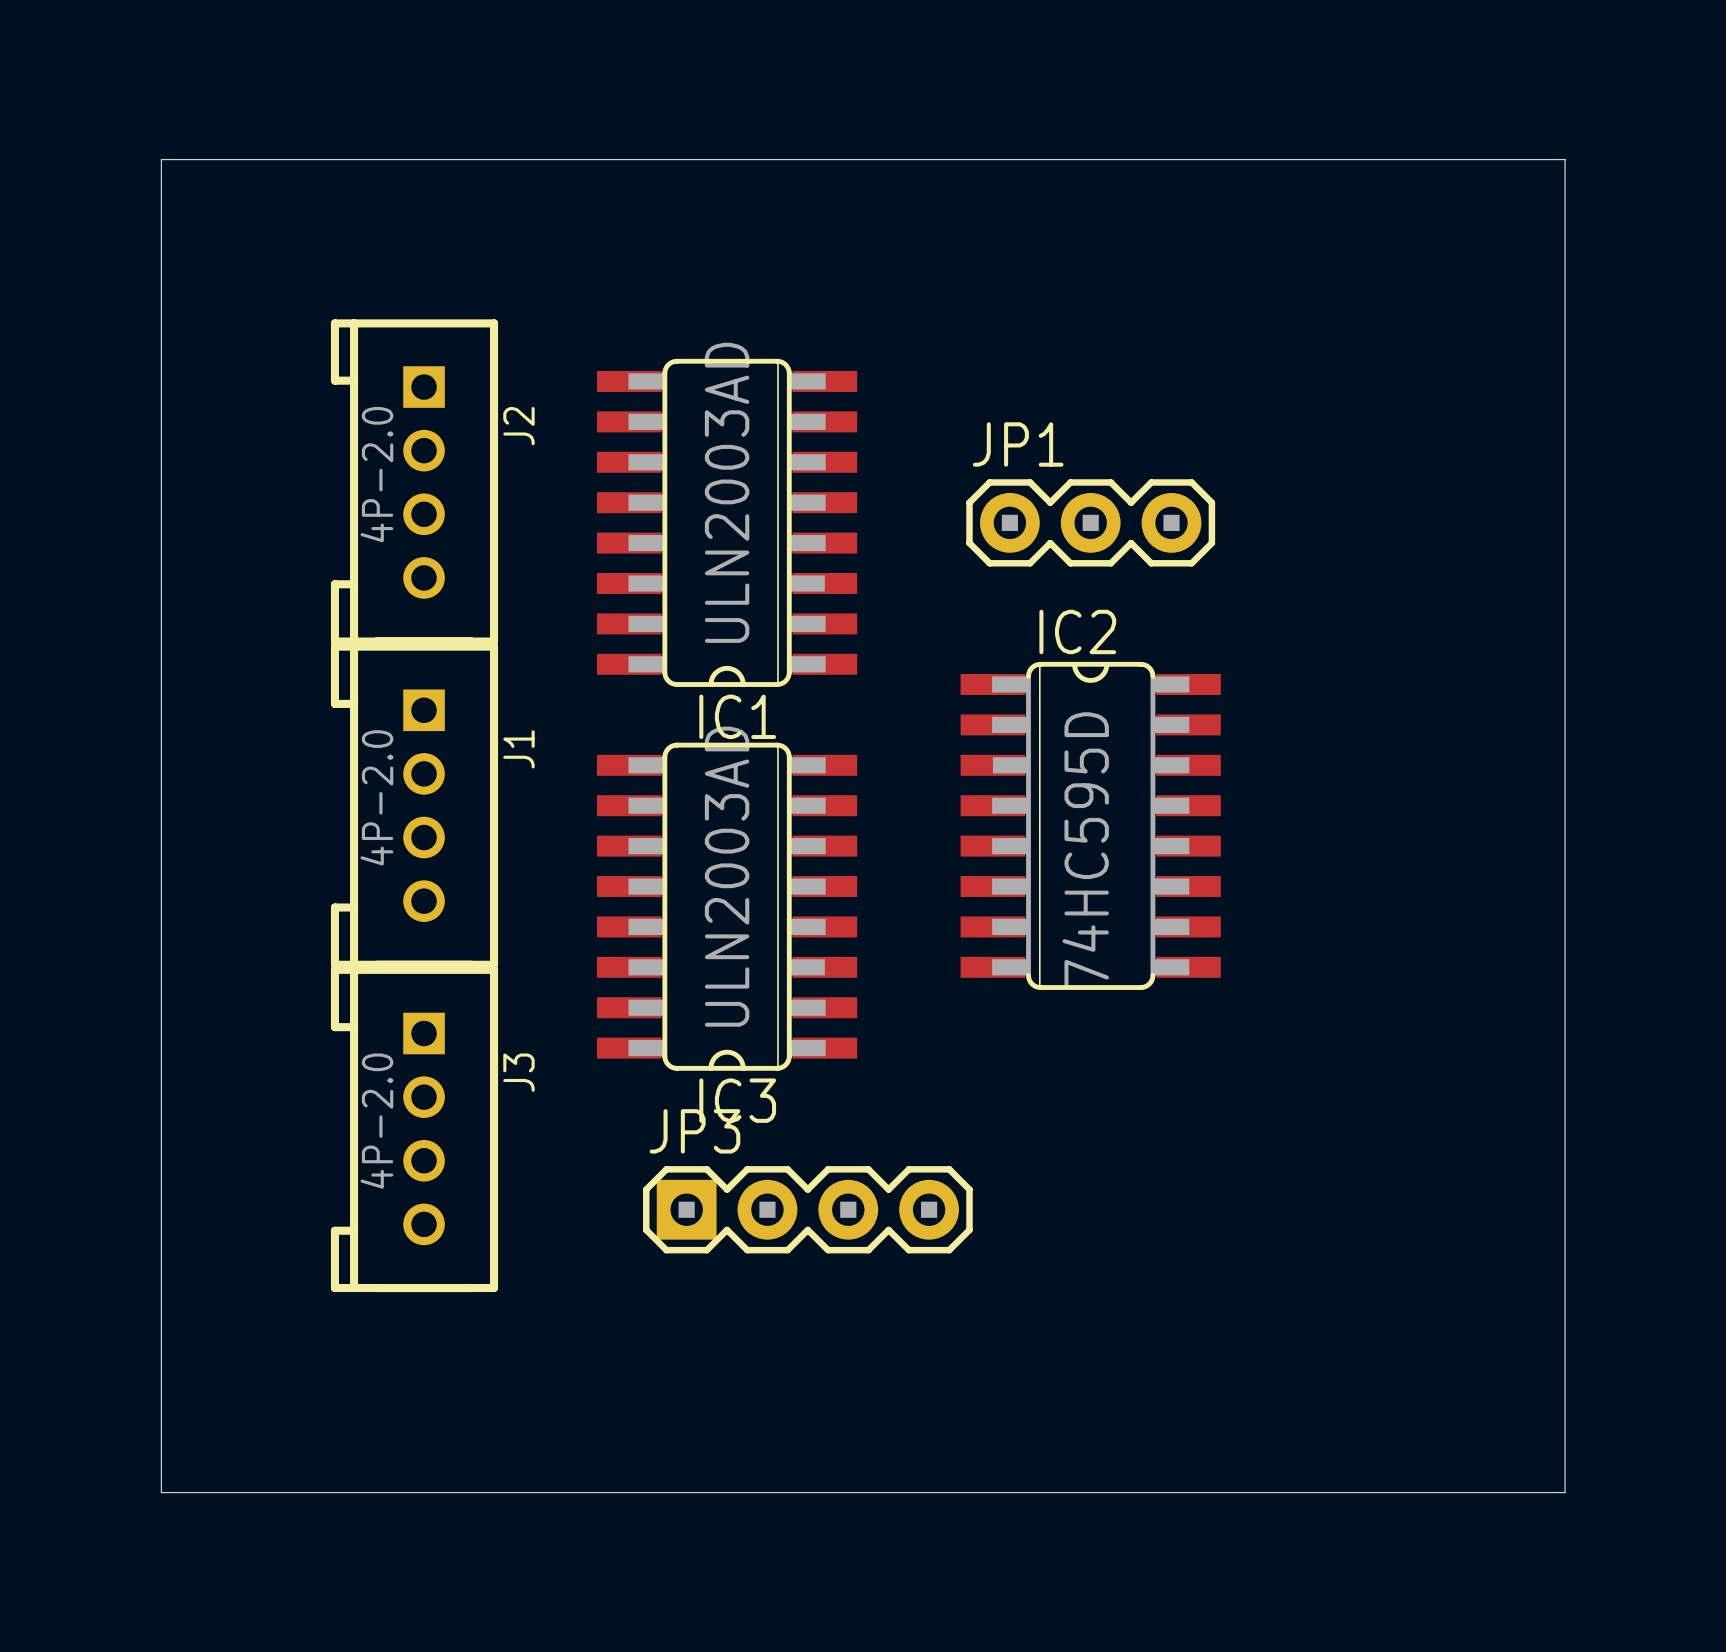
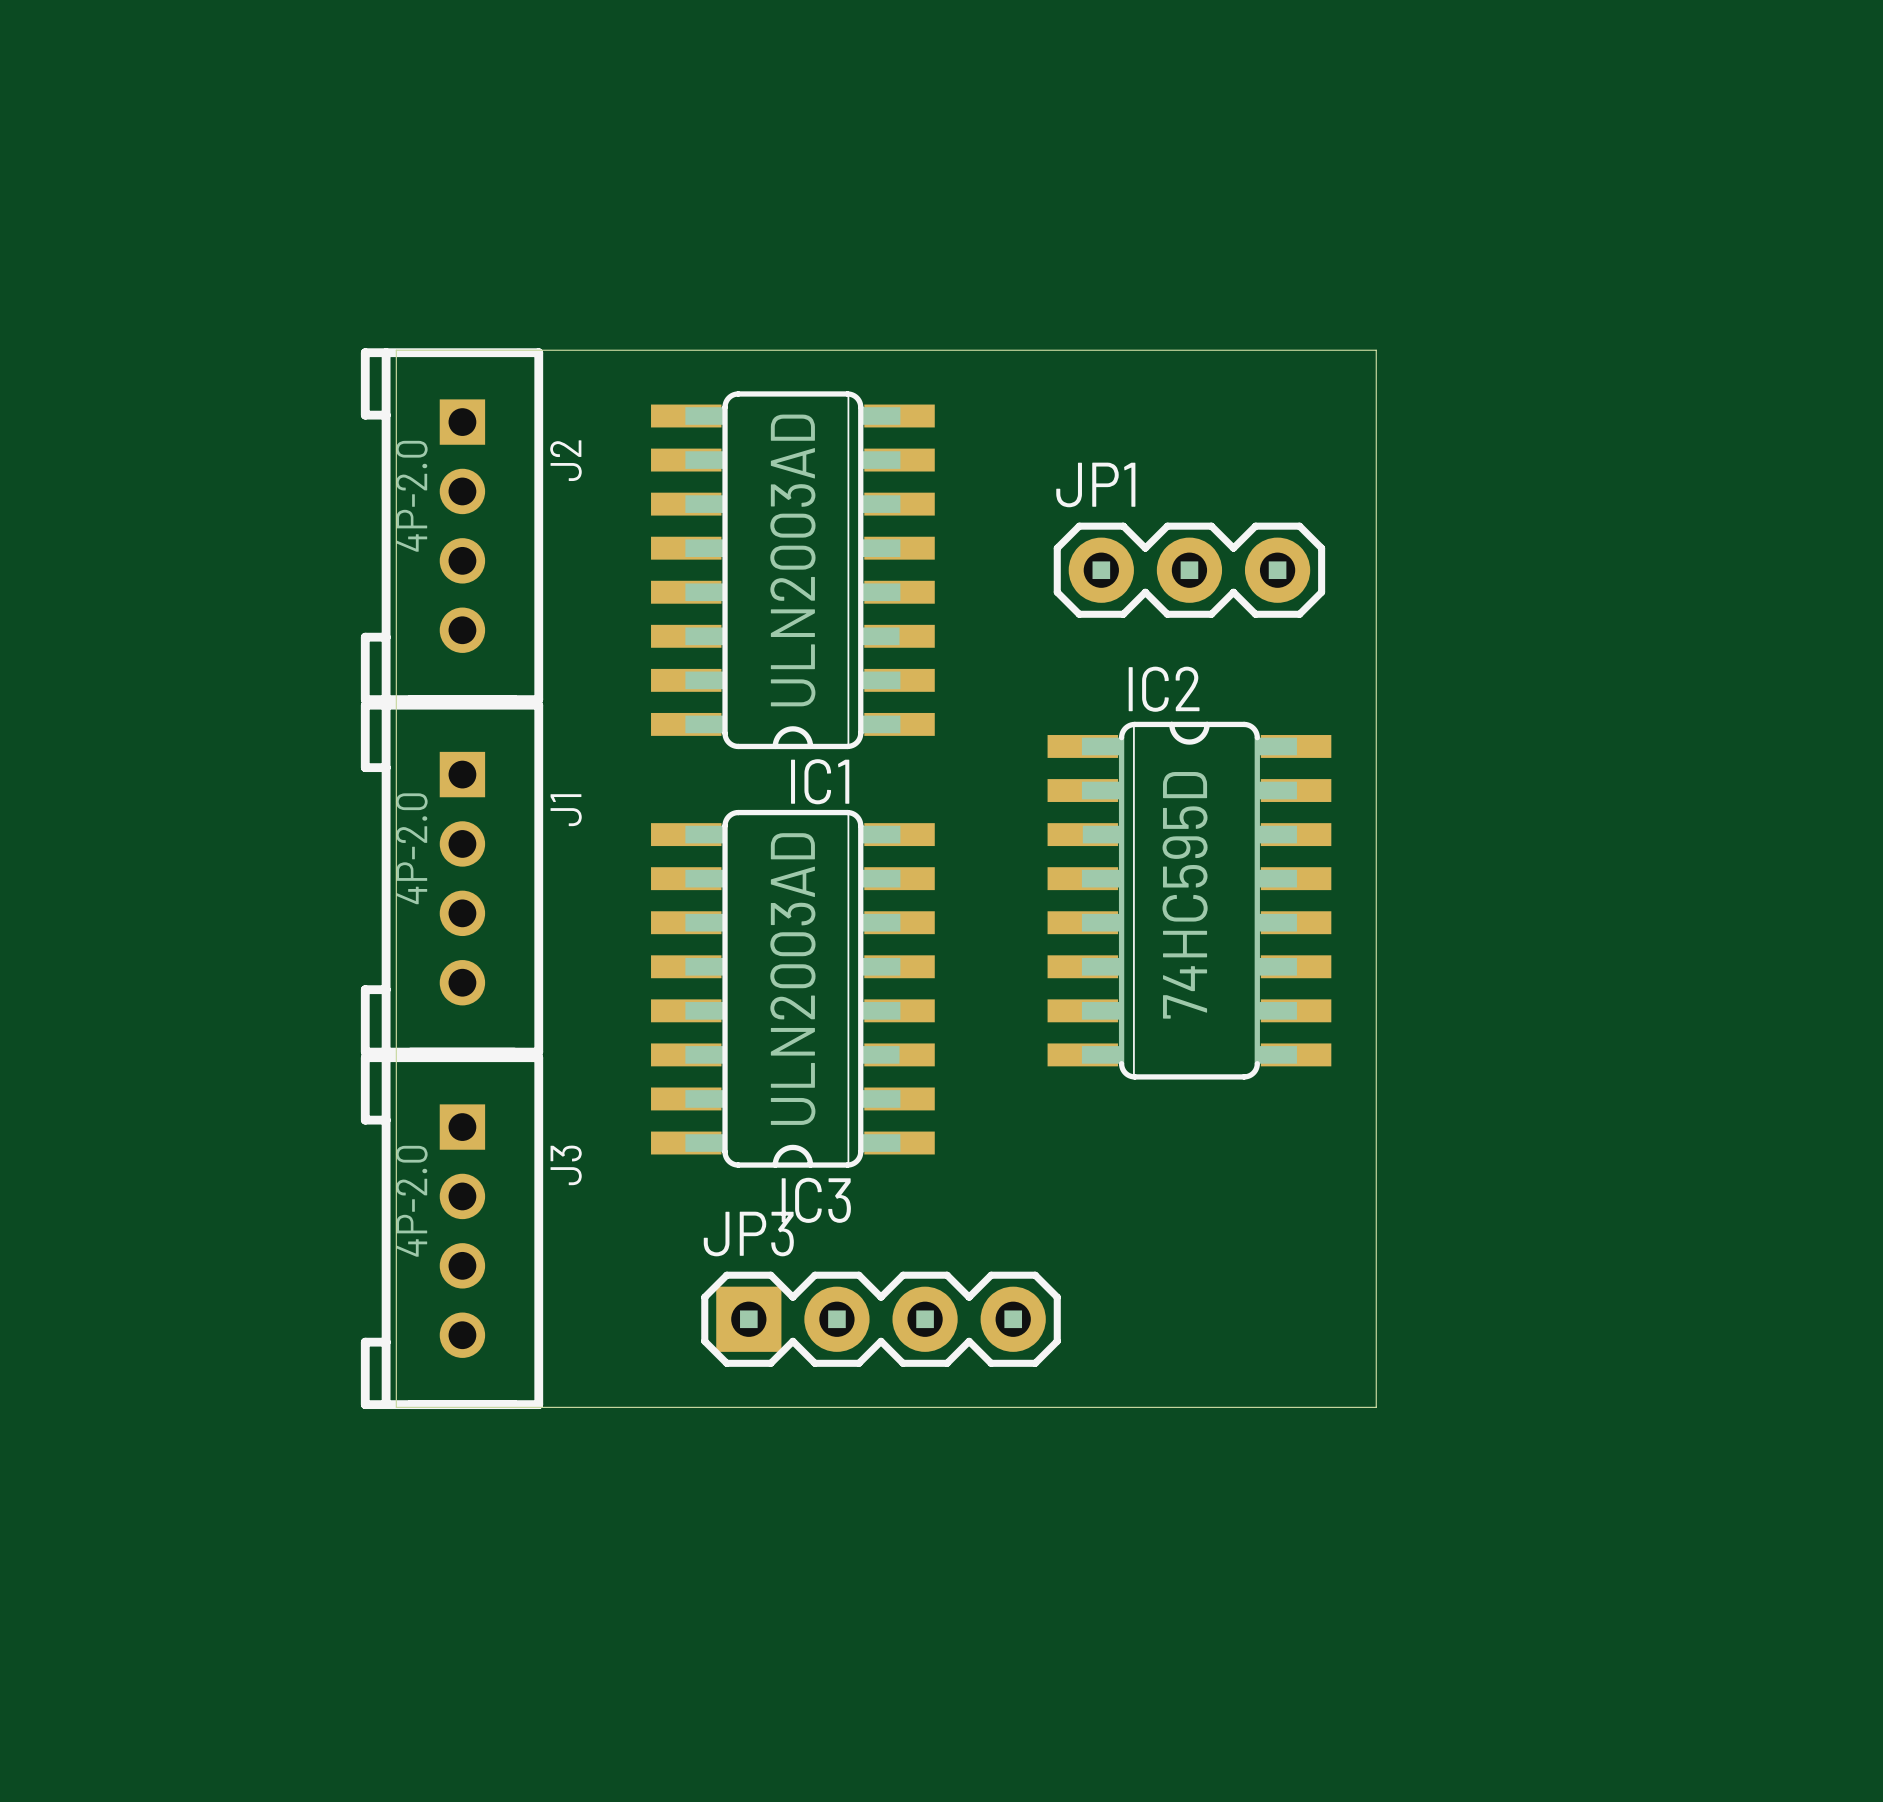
board edge: (161, 159) (1565, 159) (1565, 1492) (161, 1492) (161, 159) -> none
board edge: none -> (396, 350) (1376, 350) (1376, 1407) (396, 1407) (396, 350)

